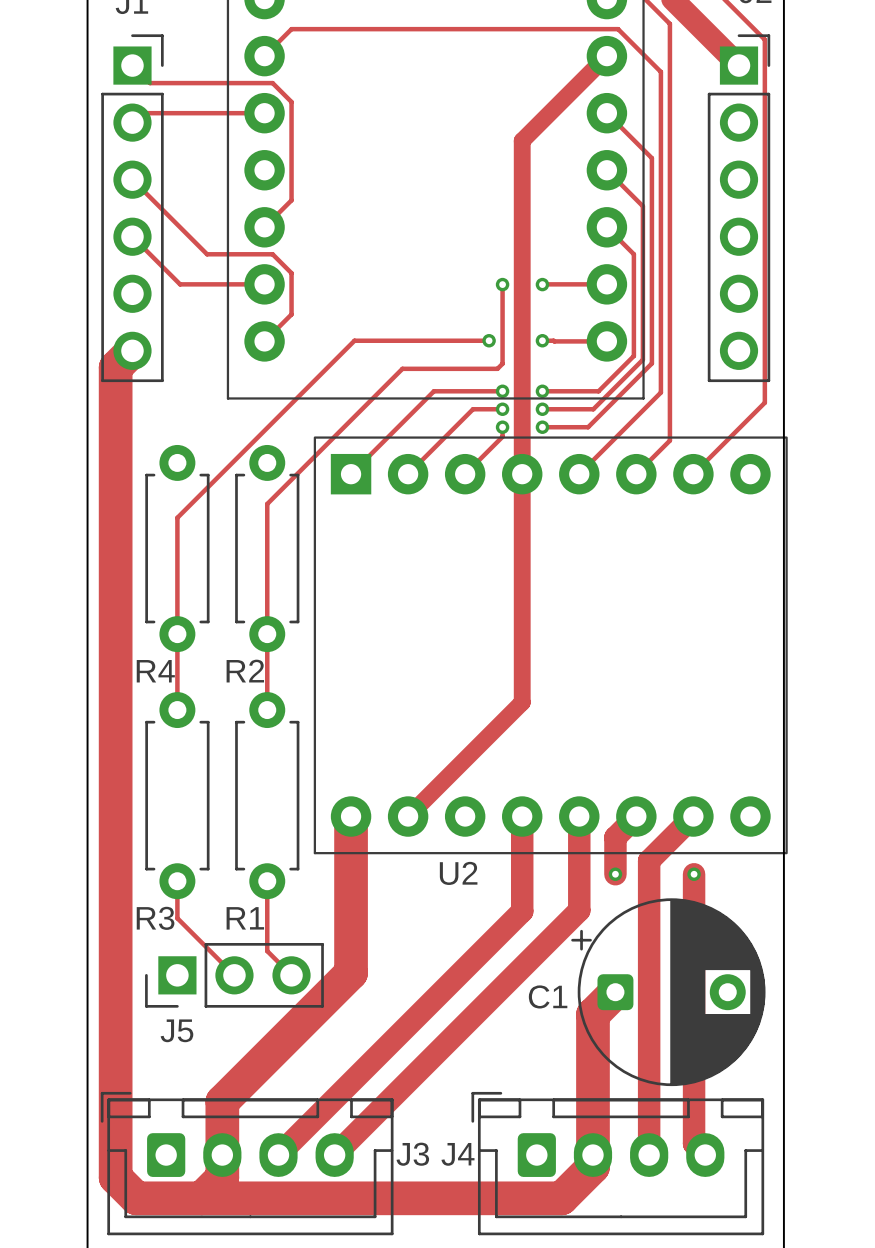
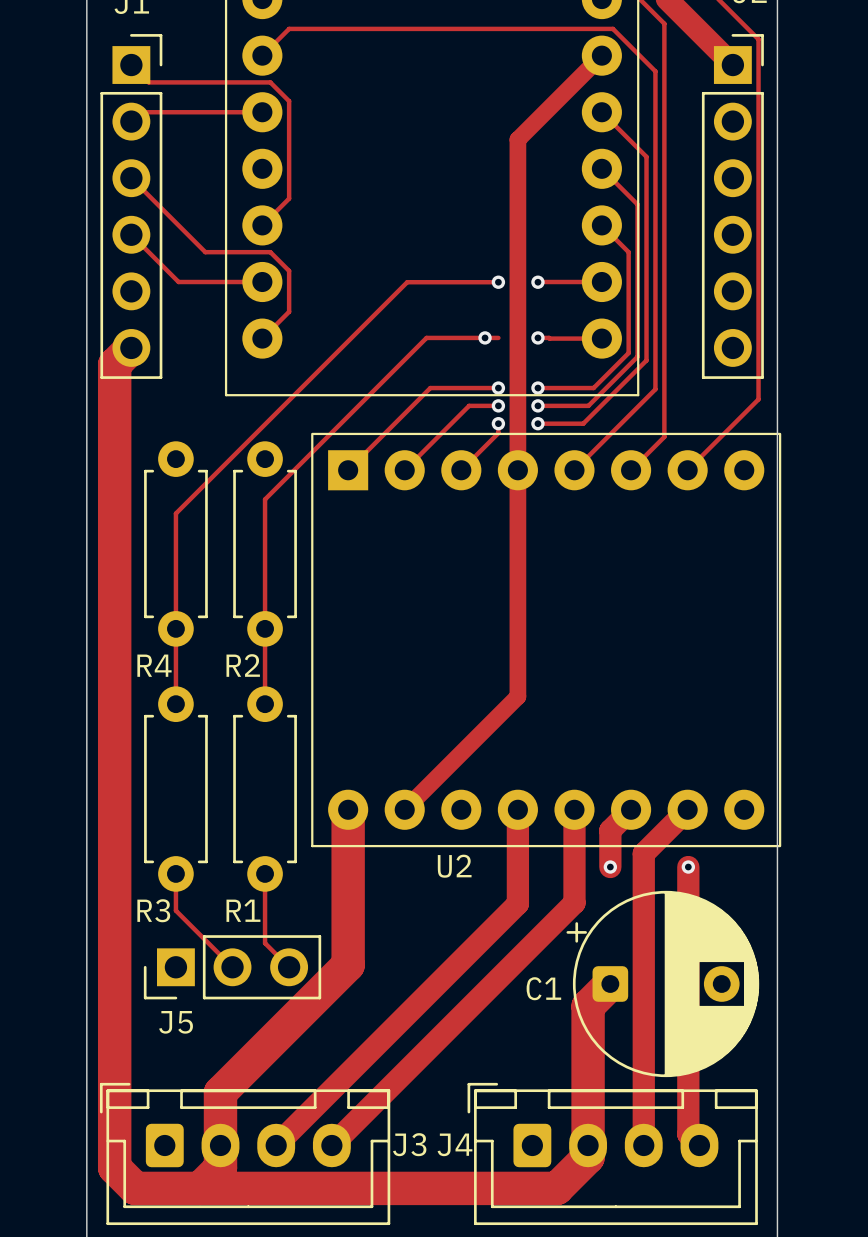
track: (502, 284) (502, 363) (497, 368) (402, 368) (267, 504) -> (426, 337) (265, 499)
track: (354, 340) (430, 340) -> (351, 337) (407, 282) (498, 282)
track: none -> (485, 337) (498, 337)

